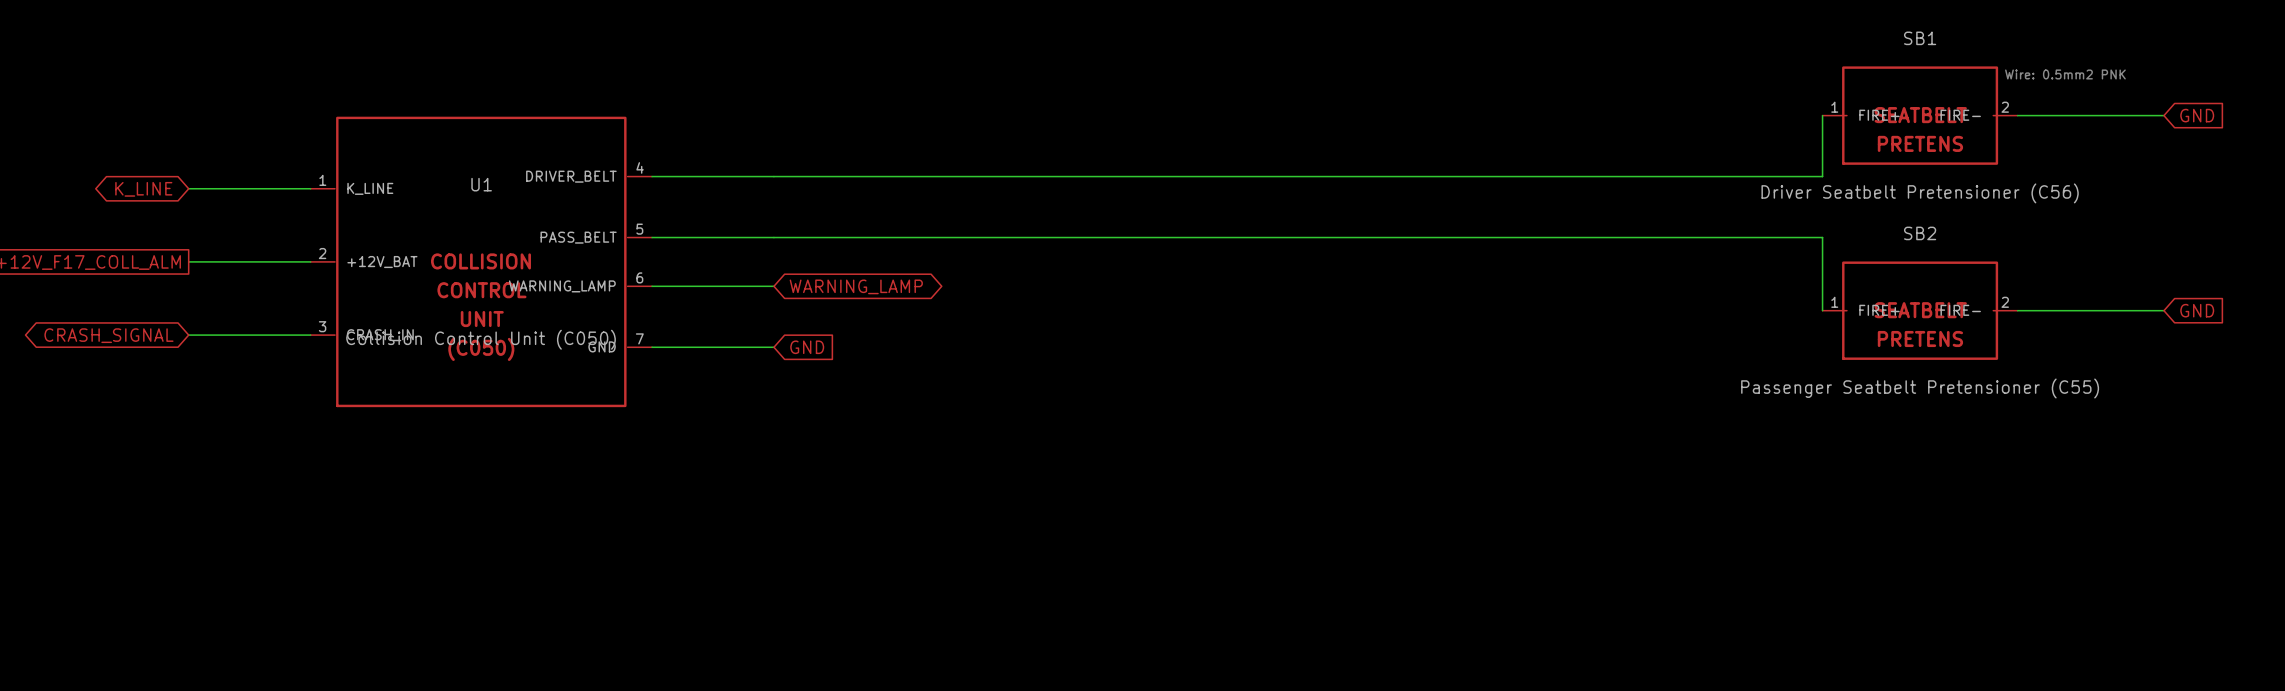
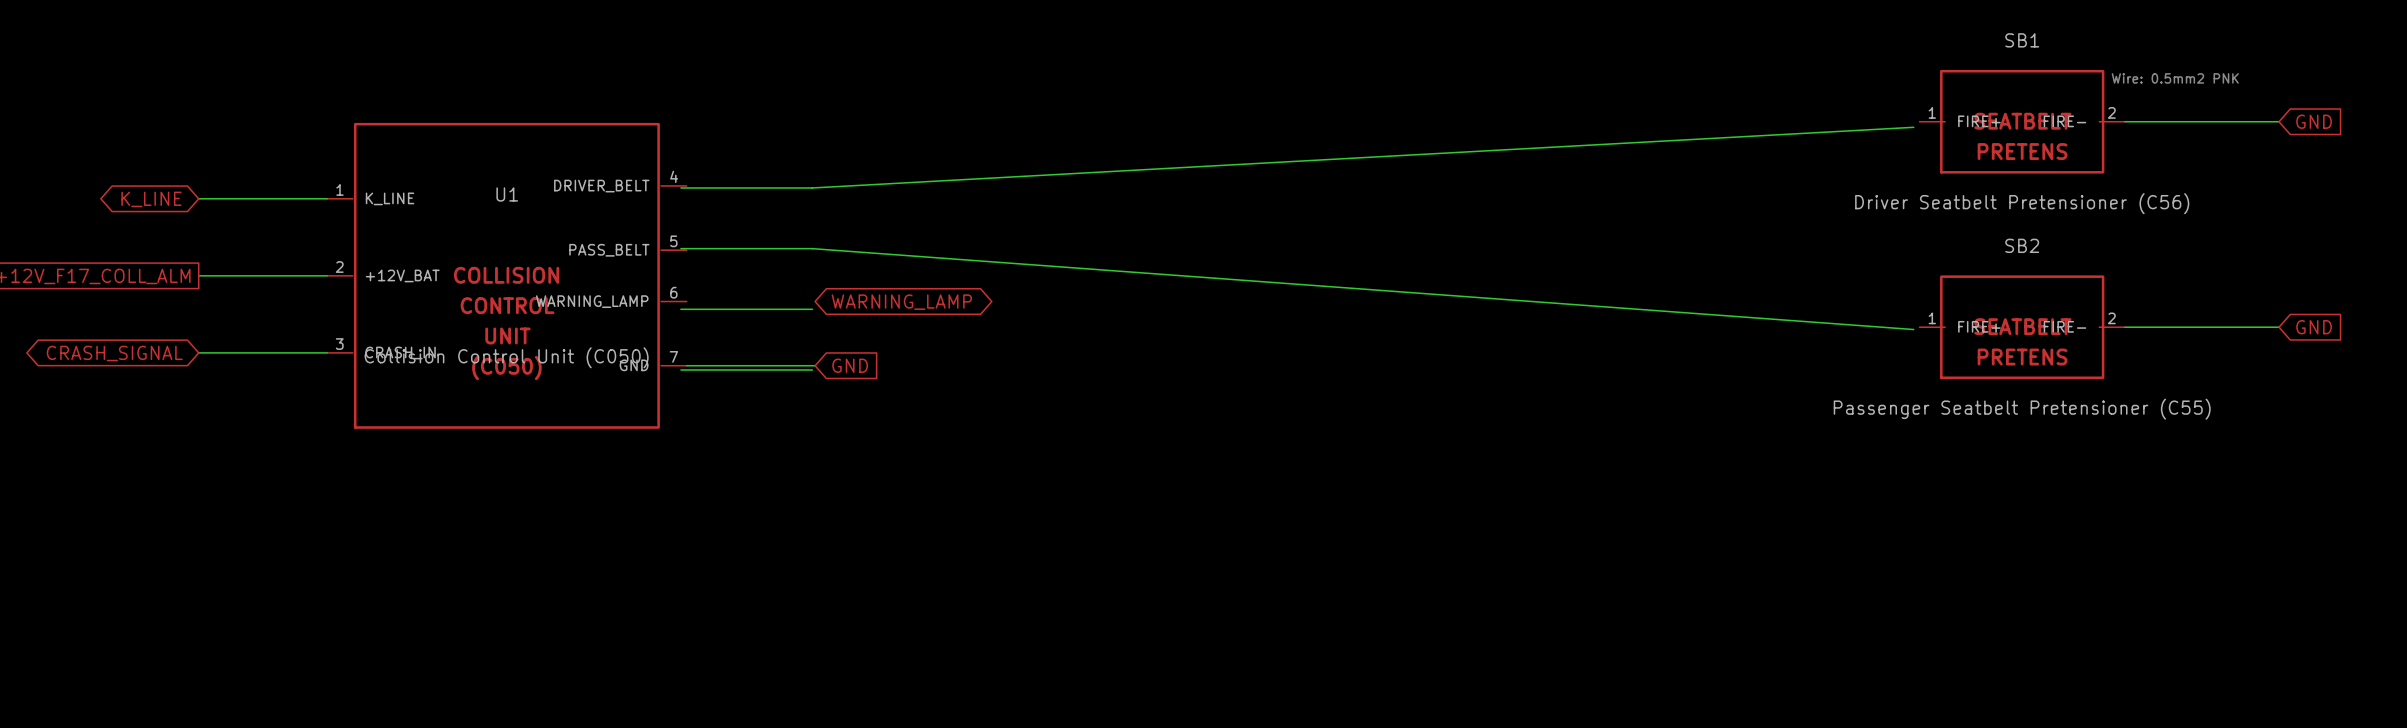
wire: (1822, 115) (1822, 176) (652, 176) -> none
wire: none -> (1913, 127) (812, 187) (680, 187)
wire: none -> (680, 248) (812, 248) (1913, 329)
wire: (652, 237) (1822, 237) (1822, 310) -> none
wire: (652, 286) (773, 286) -> none
wire: none -> (680, 309) (812, 309)
wire: none -> (680, 369) (812, 369)

